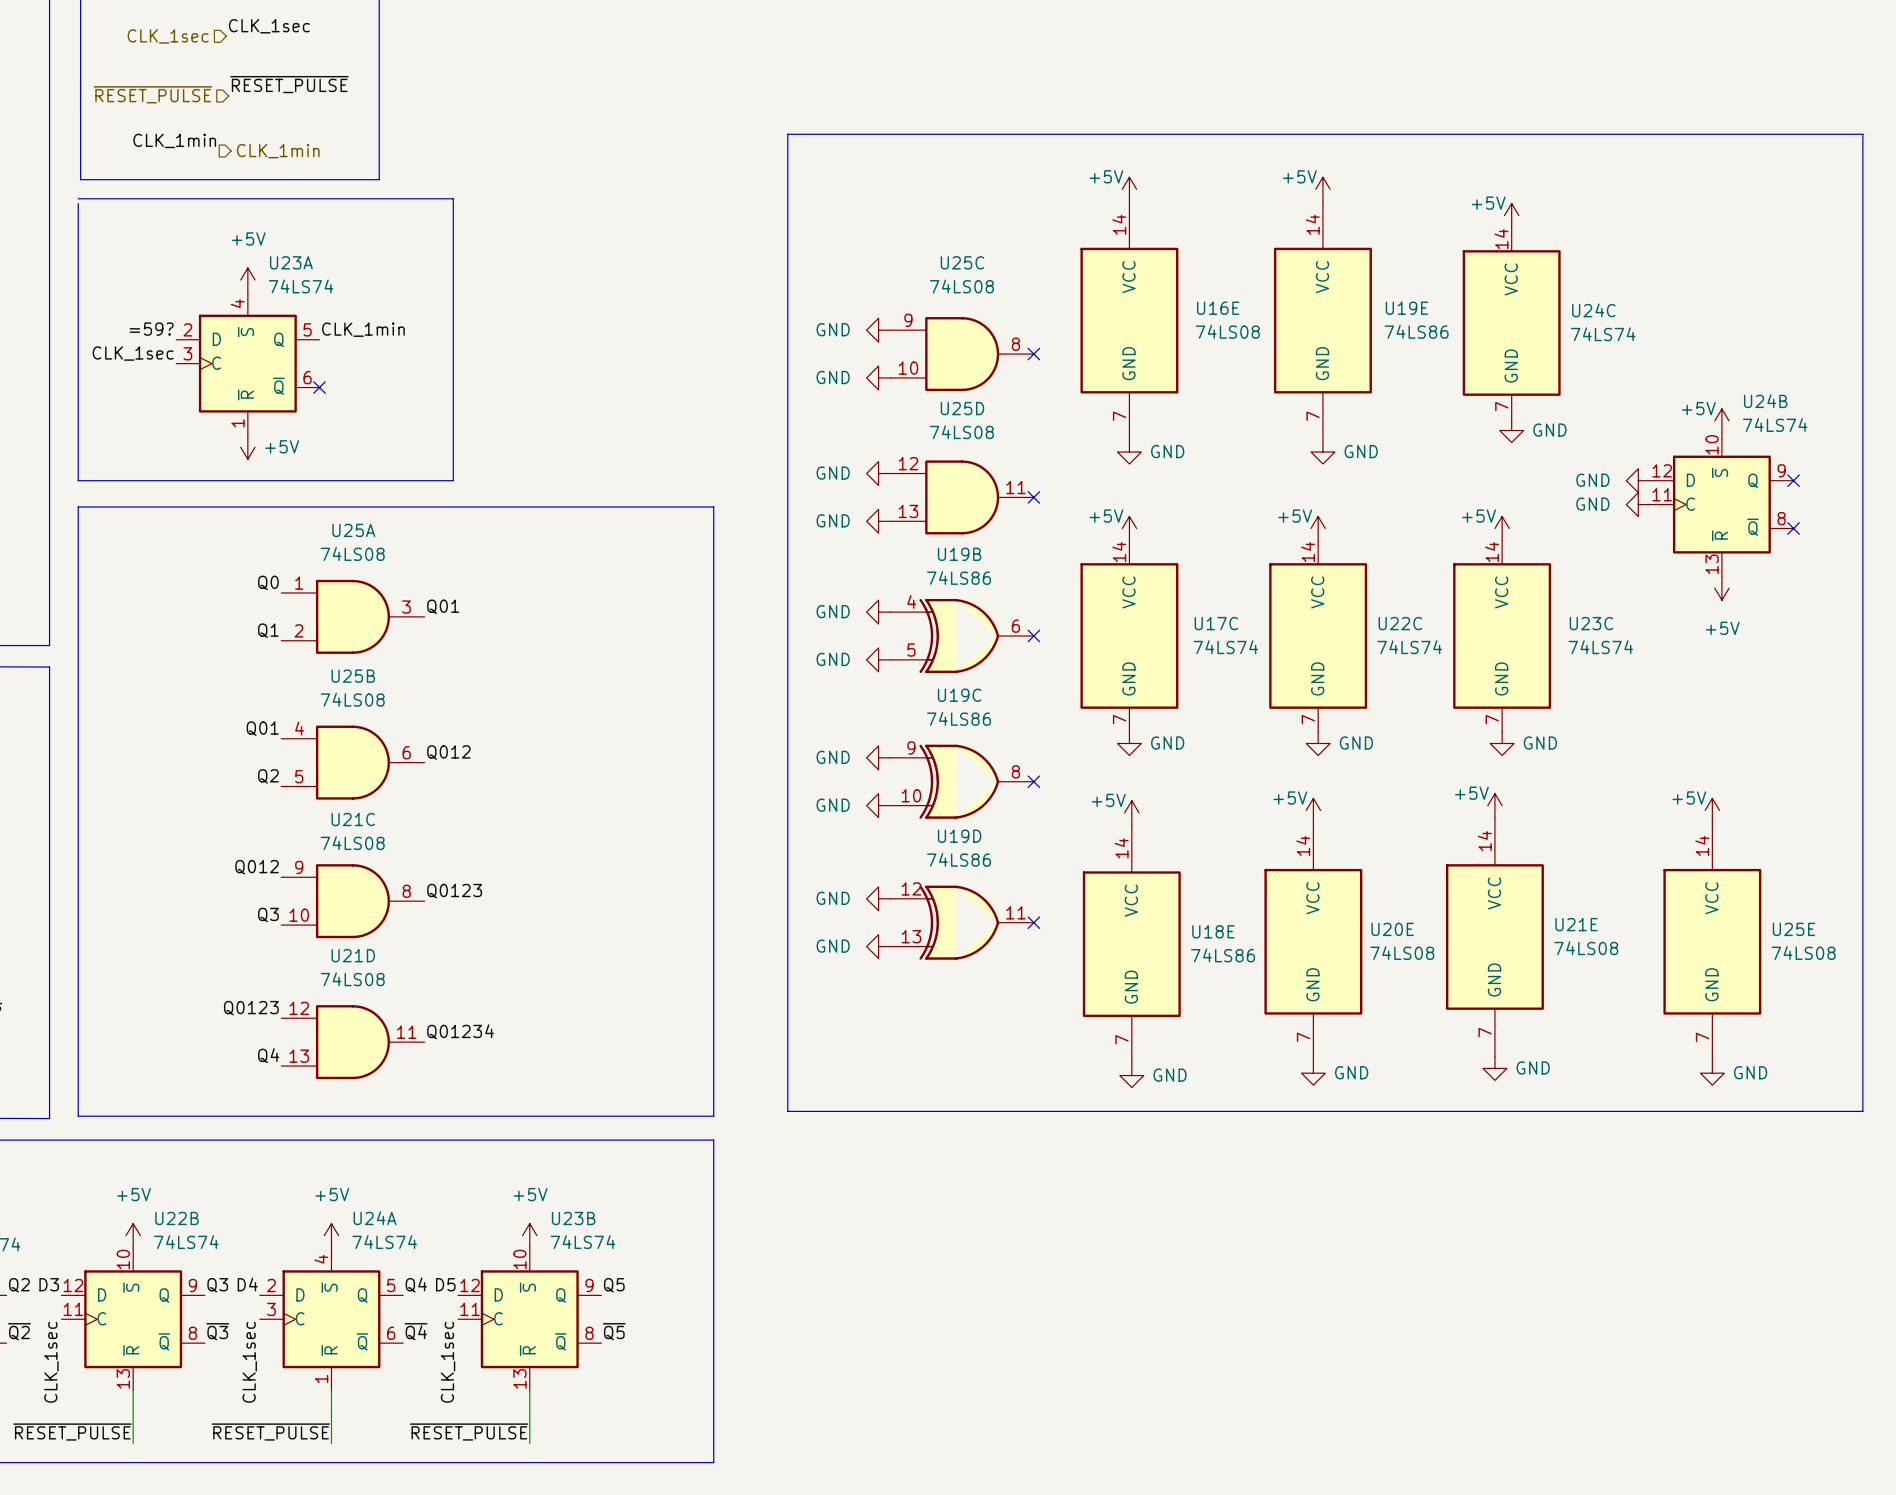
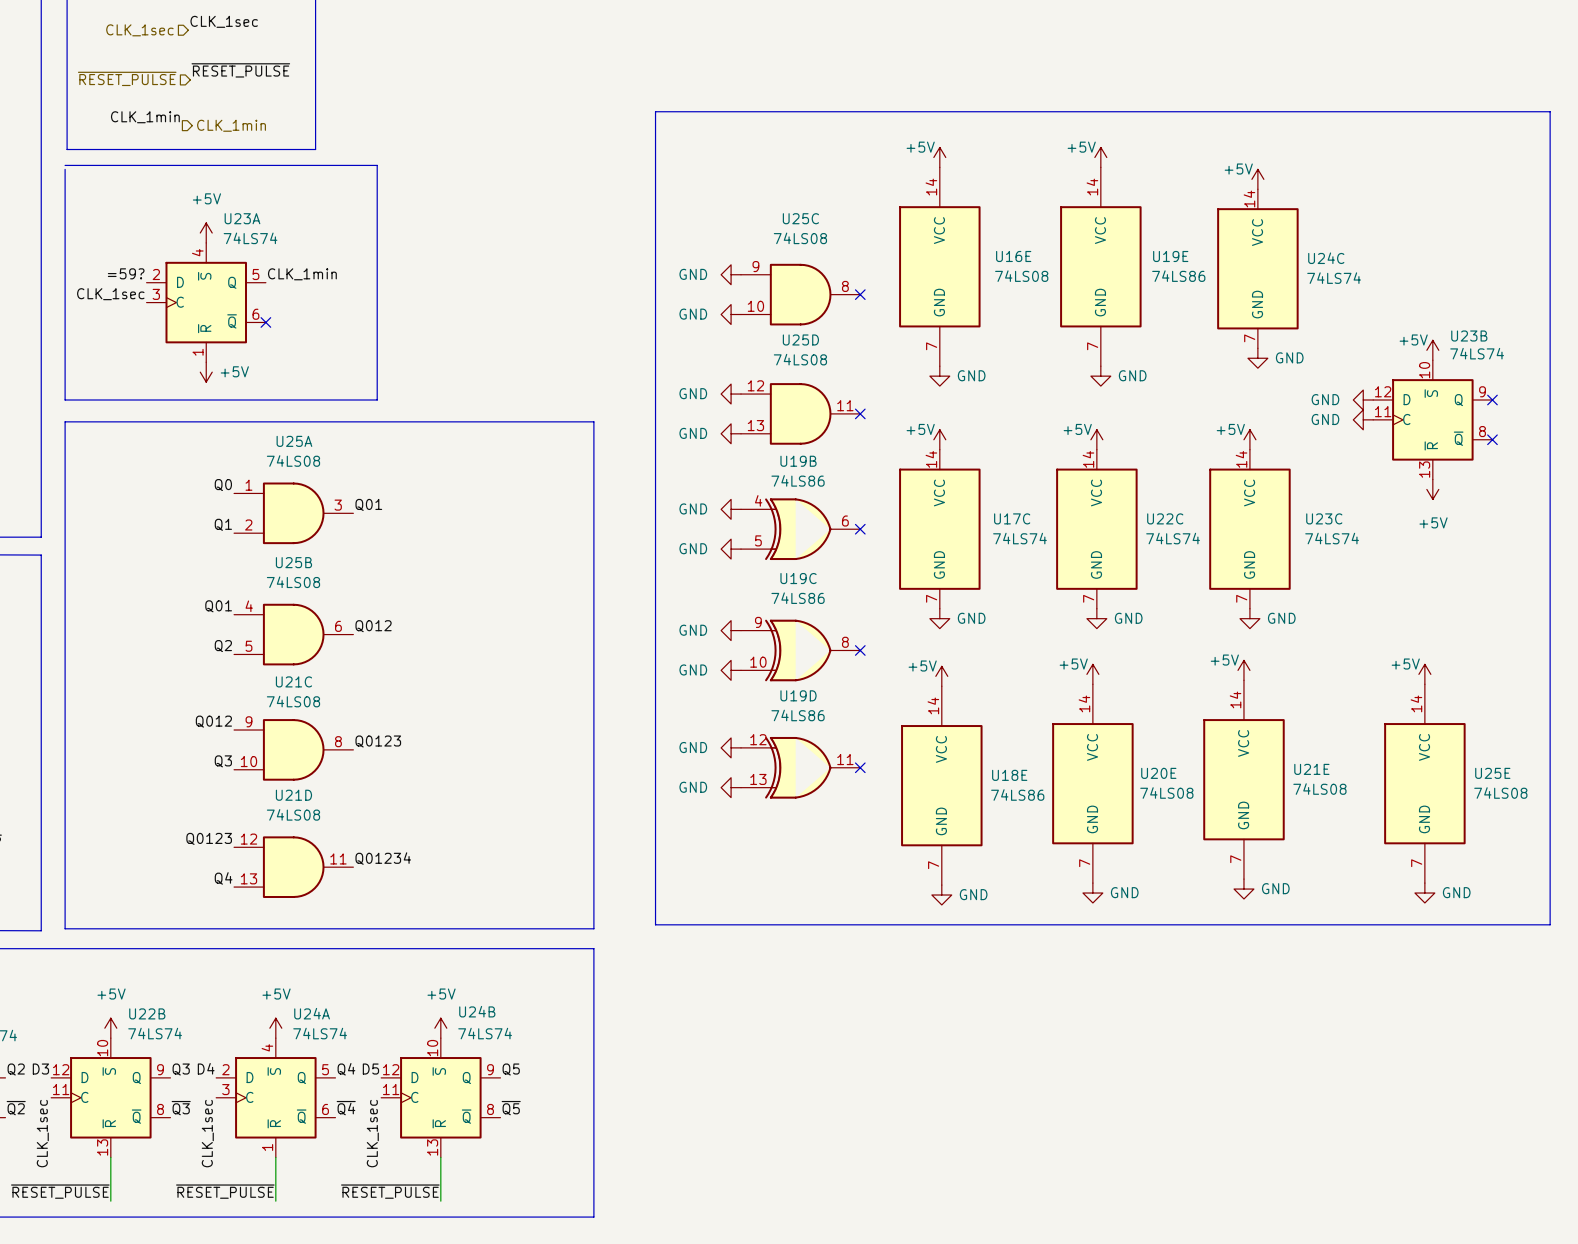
U24B name: U24B (1765, 401) -> U23B (1469, 336)
U23B name: U23B (573, 1218) -> U24B (477, 1011)

